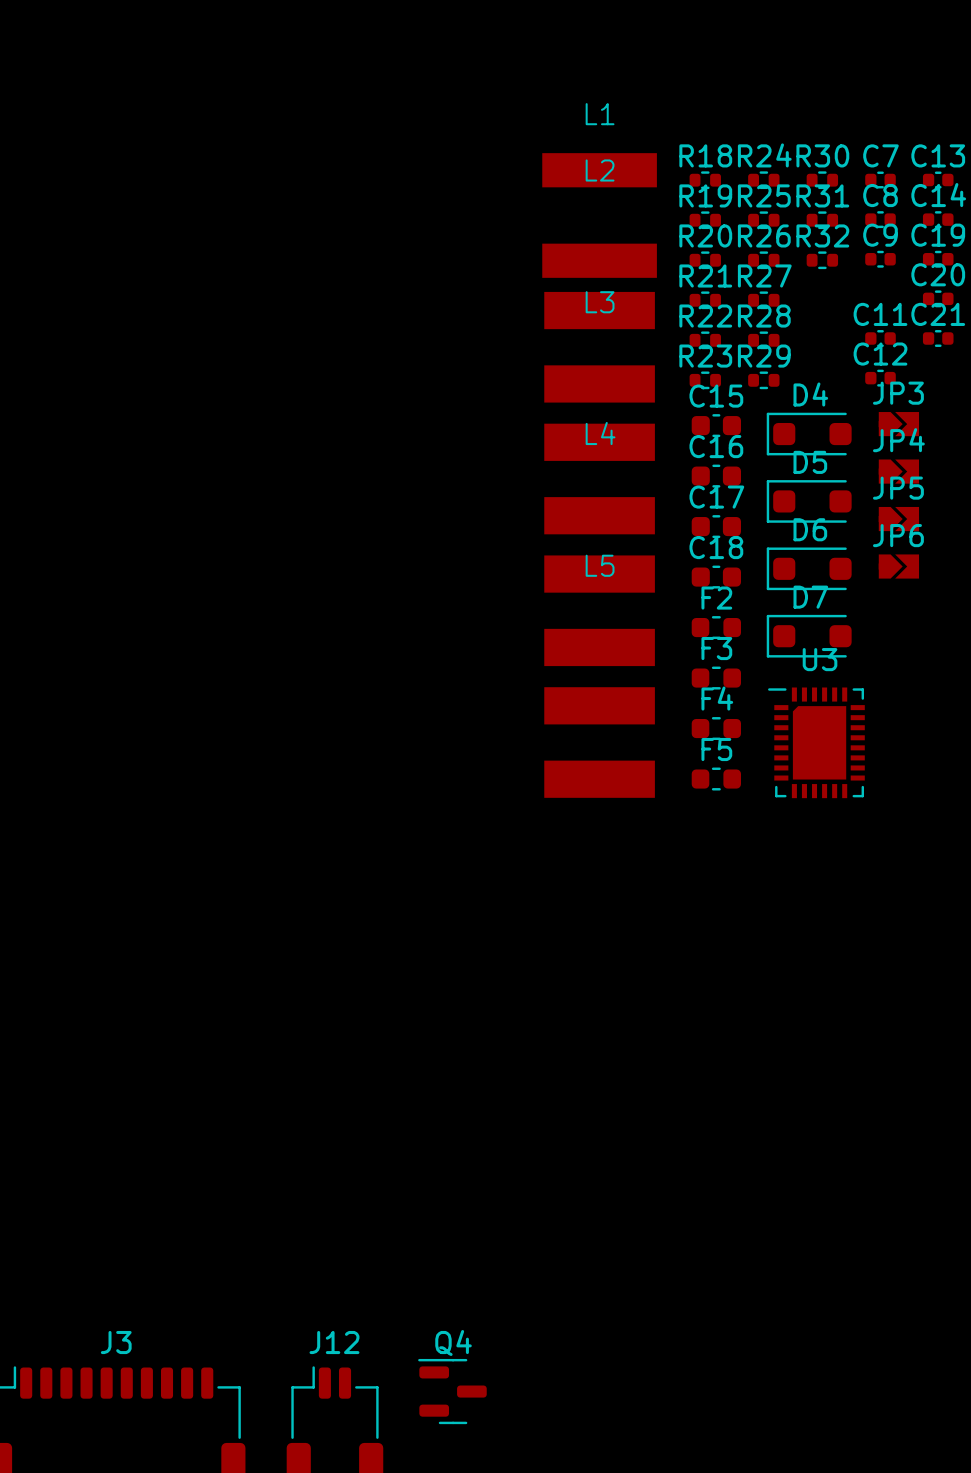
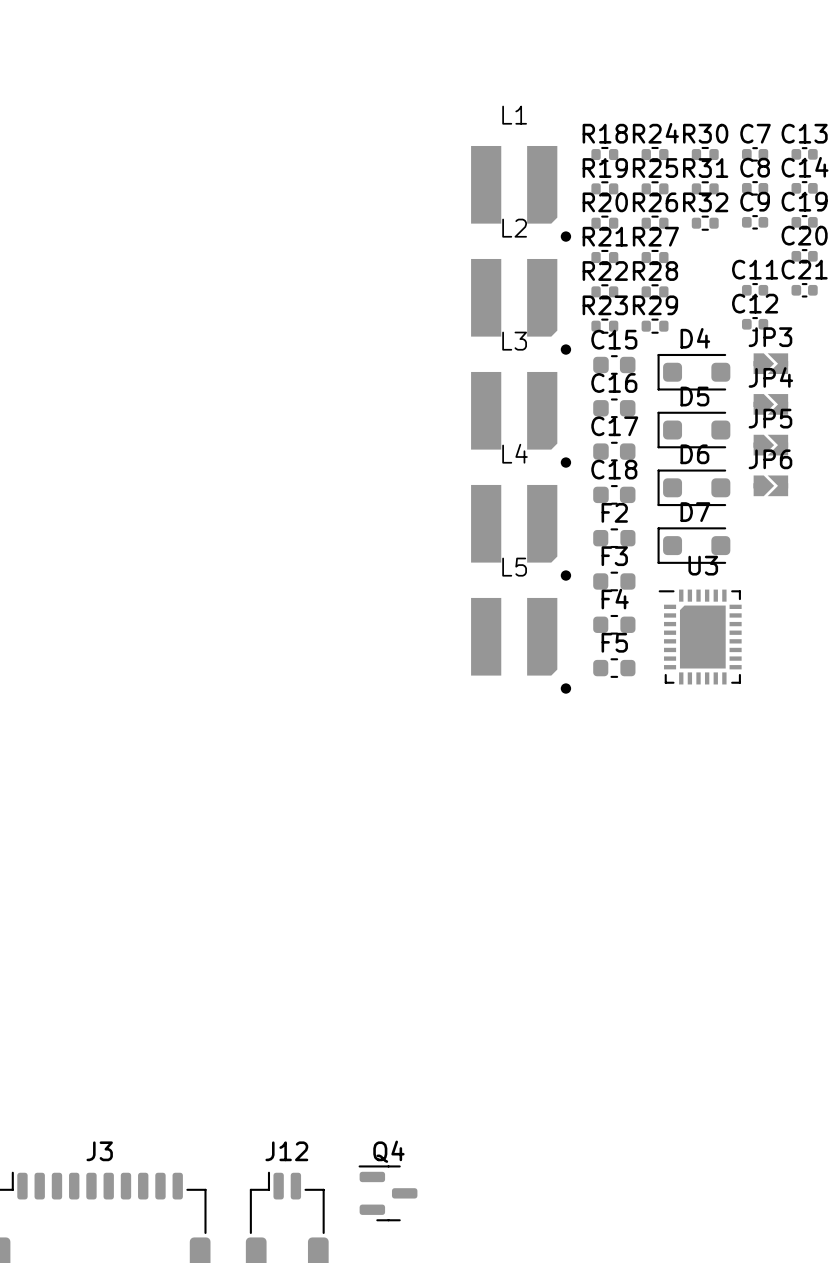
L1 footprint: [542, 153, 657, 278] -> [471, 145, 572, 242]
L2 name position: L2 (600, 170) -> L2 (514, 228)
L2 footprint: [544, 291, 655, 403] -> [471, 258, 572, 355]
L3 name position: L3 (600, 302) -> L3 (514, 341)
L3 footprint: [544, 423, 655, 535] -> [471, 371, 572, 468]
L4 name position: L4 (600, 433) -> L4 (515, 453)
L4 footprint: [544, 555, 655, 667] -> [471, 484, 572, 581]
L5 name position: L5 (600, 565) -> L5 (514, 567)
L5 footprint: [544, 687, 655, 798] -> [471, 597, 572, 694]

